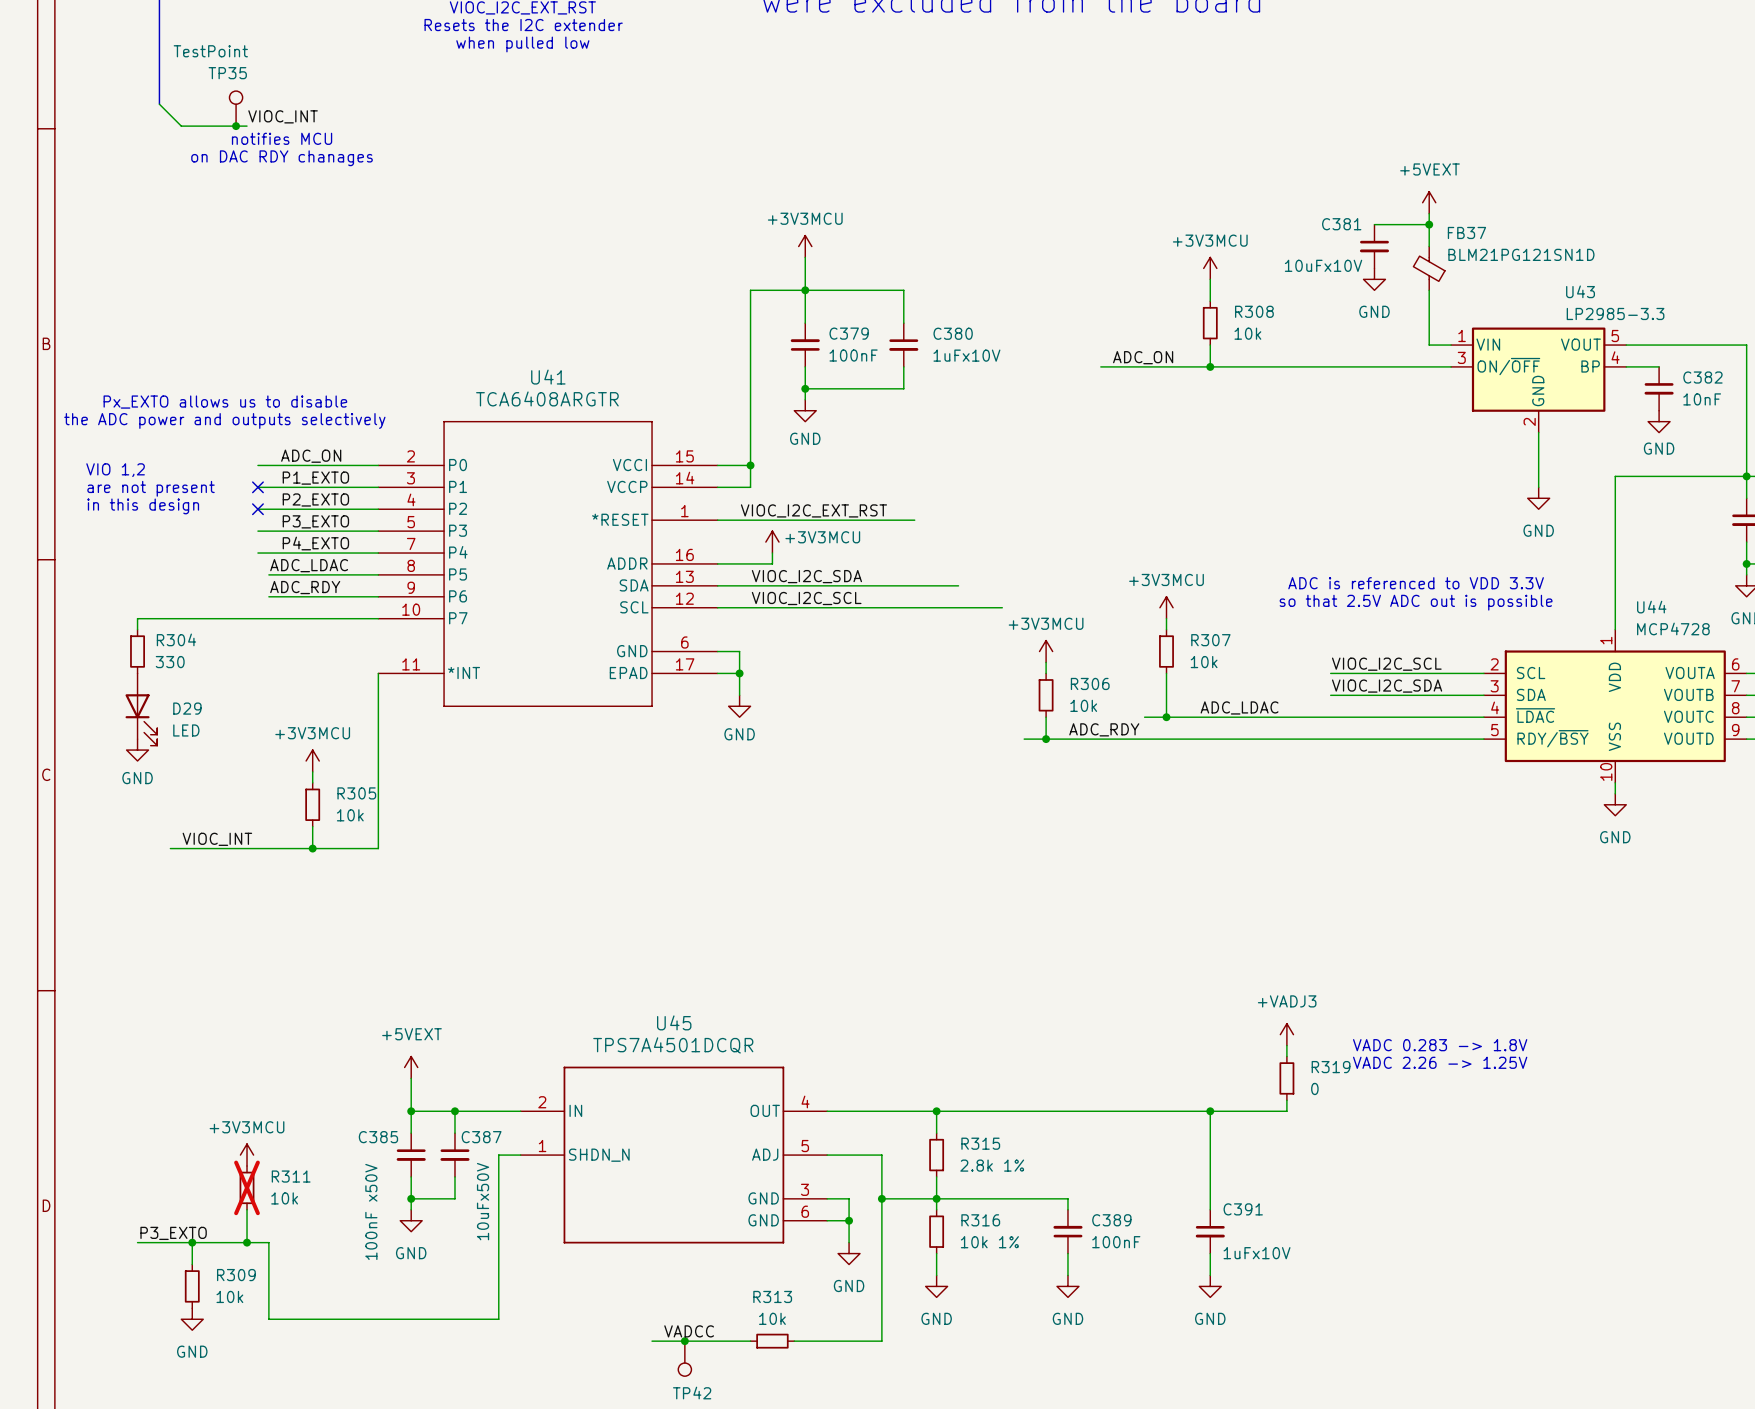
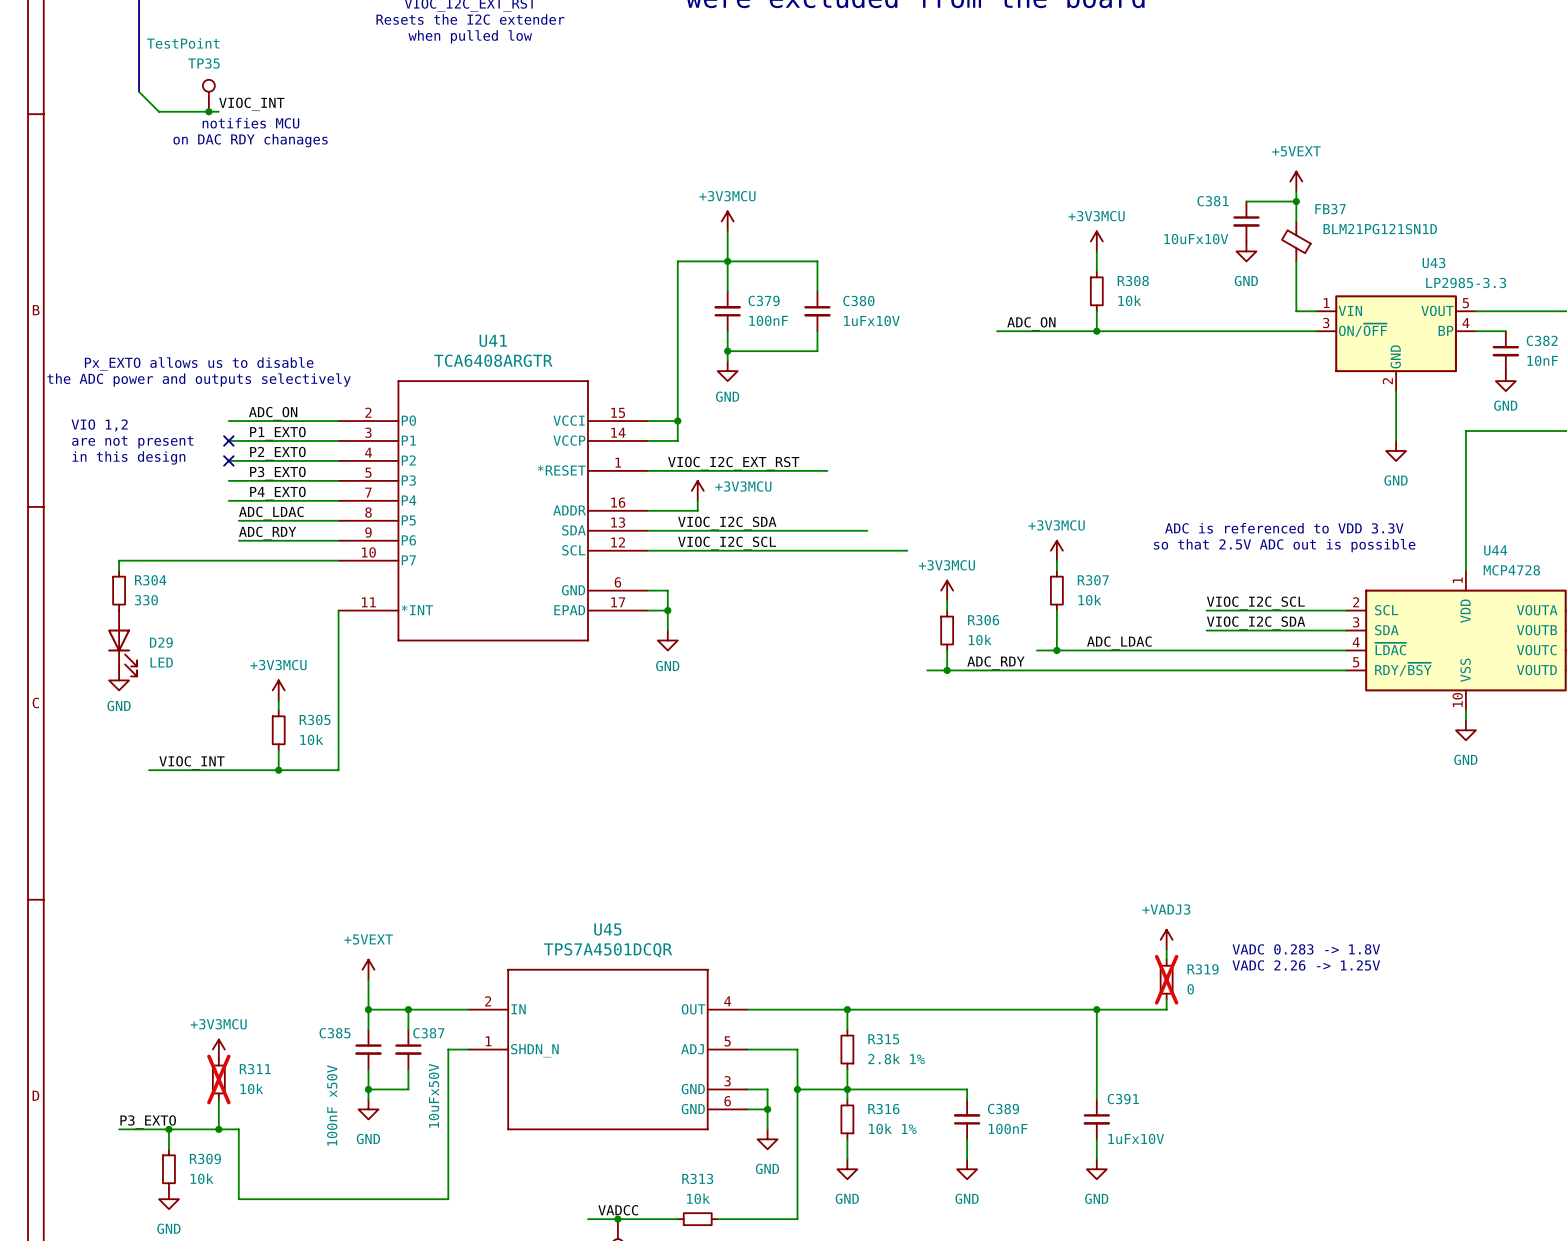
R319 do-not-place cross: none -> (1166, 979)

